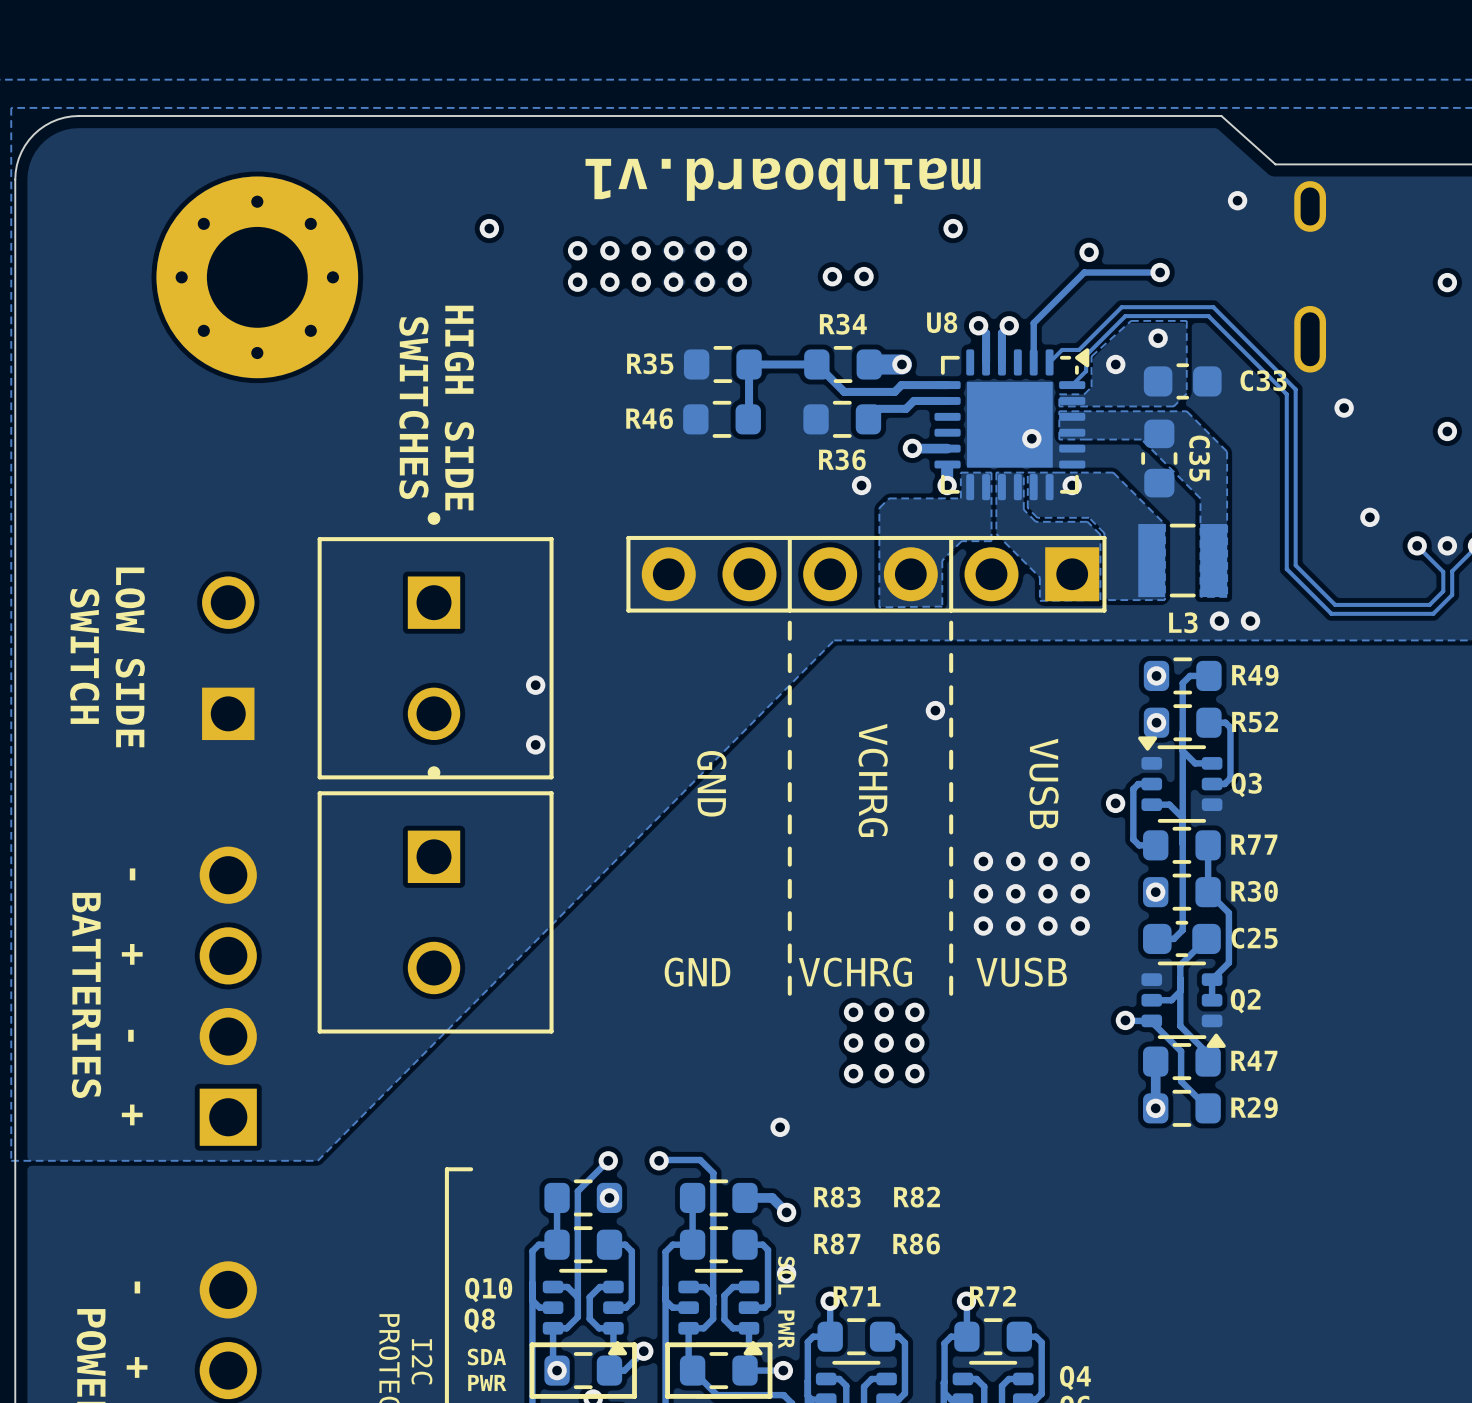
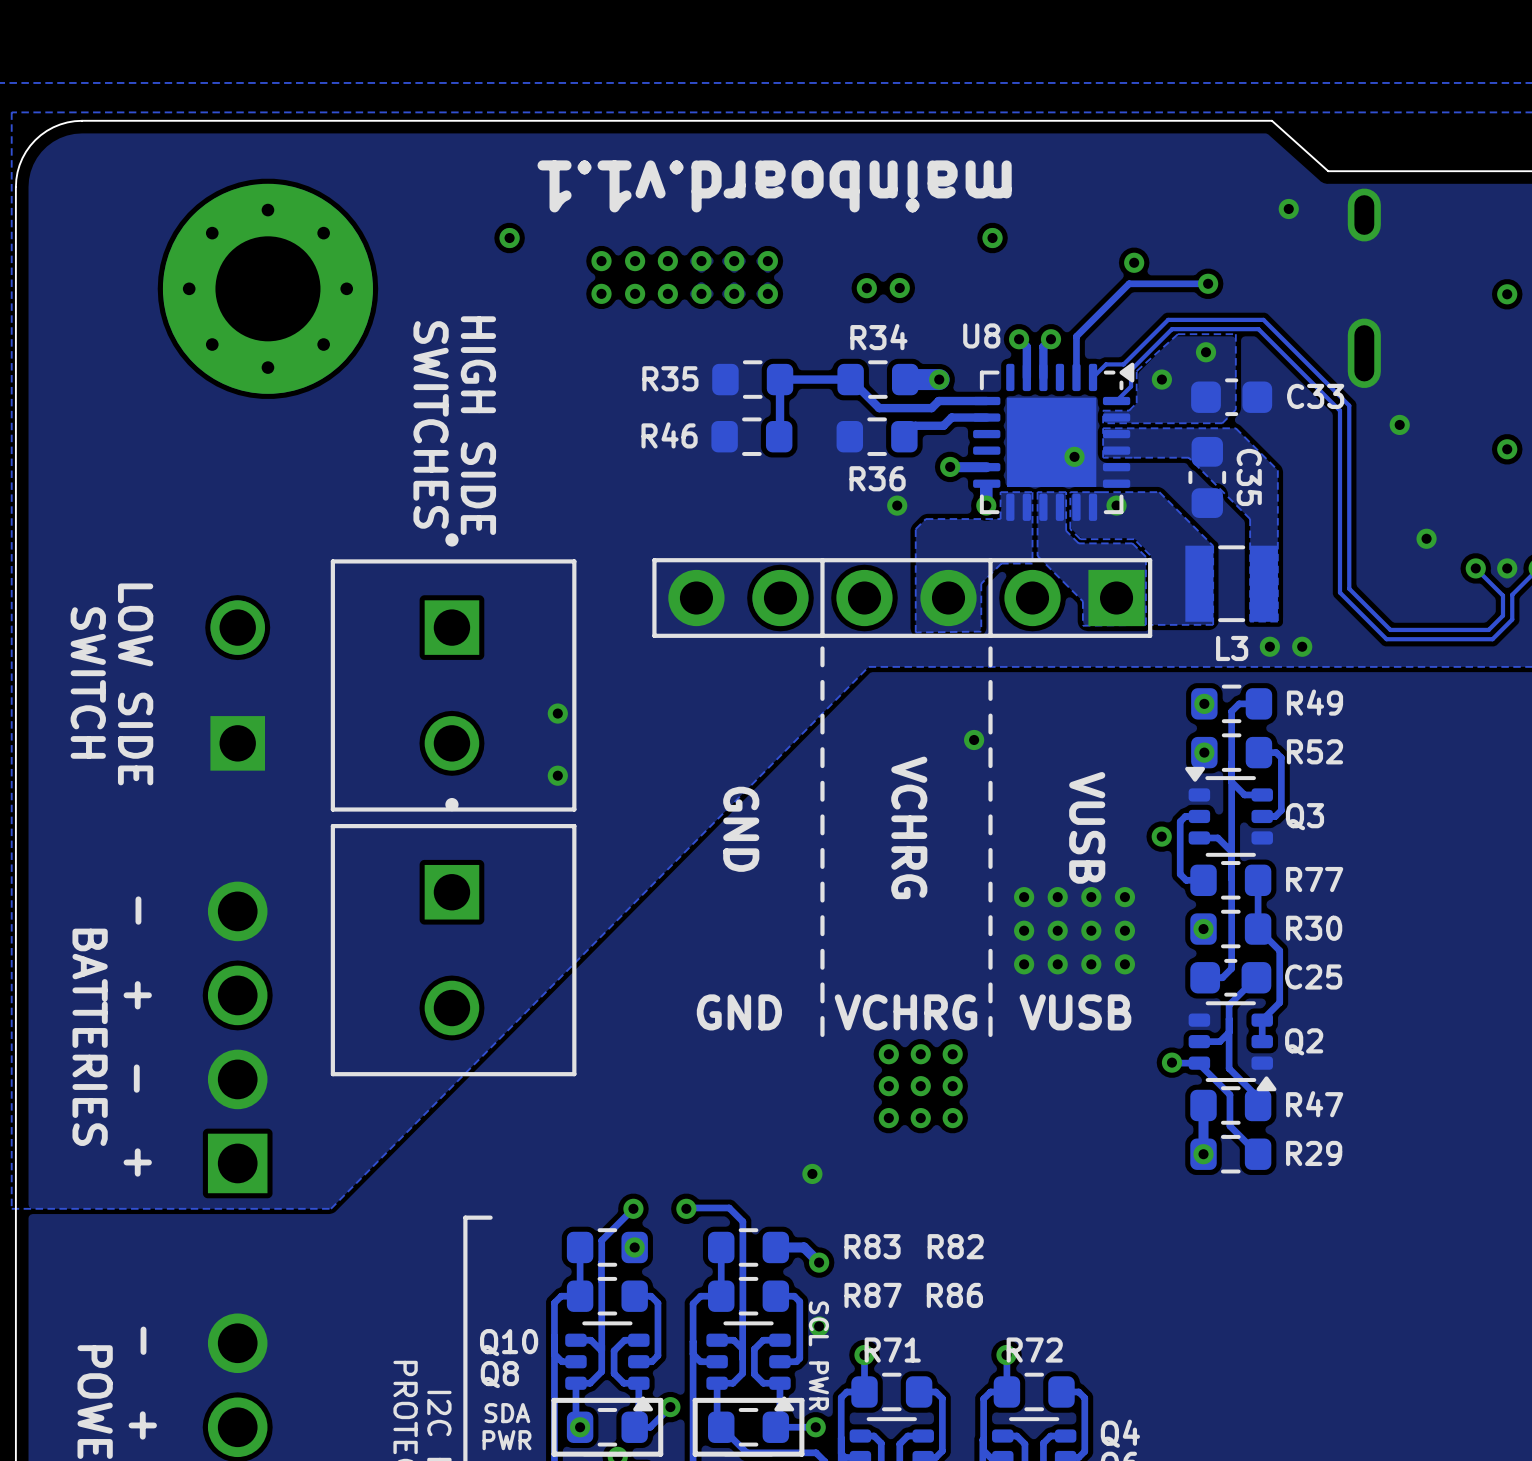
text: mainboard.v1 (782, 180) -> mainboard.v1.1 (774, 186)

